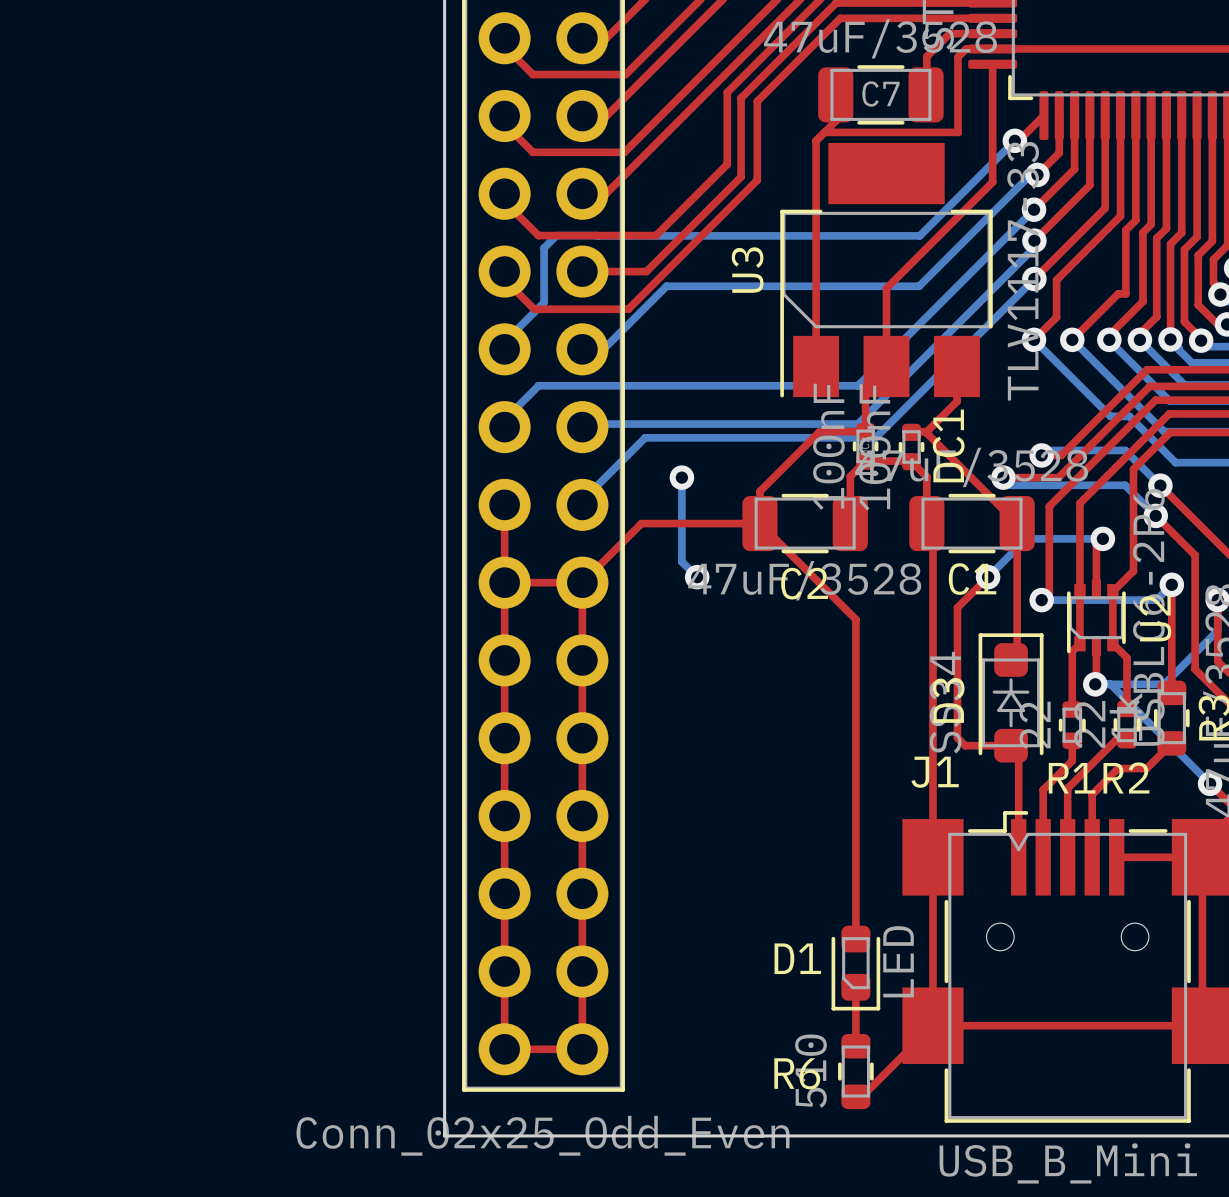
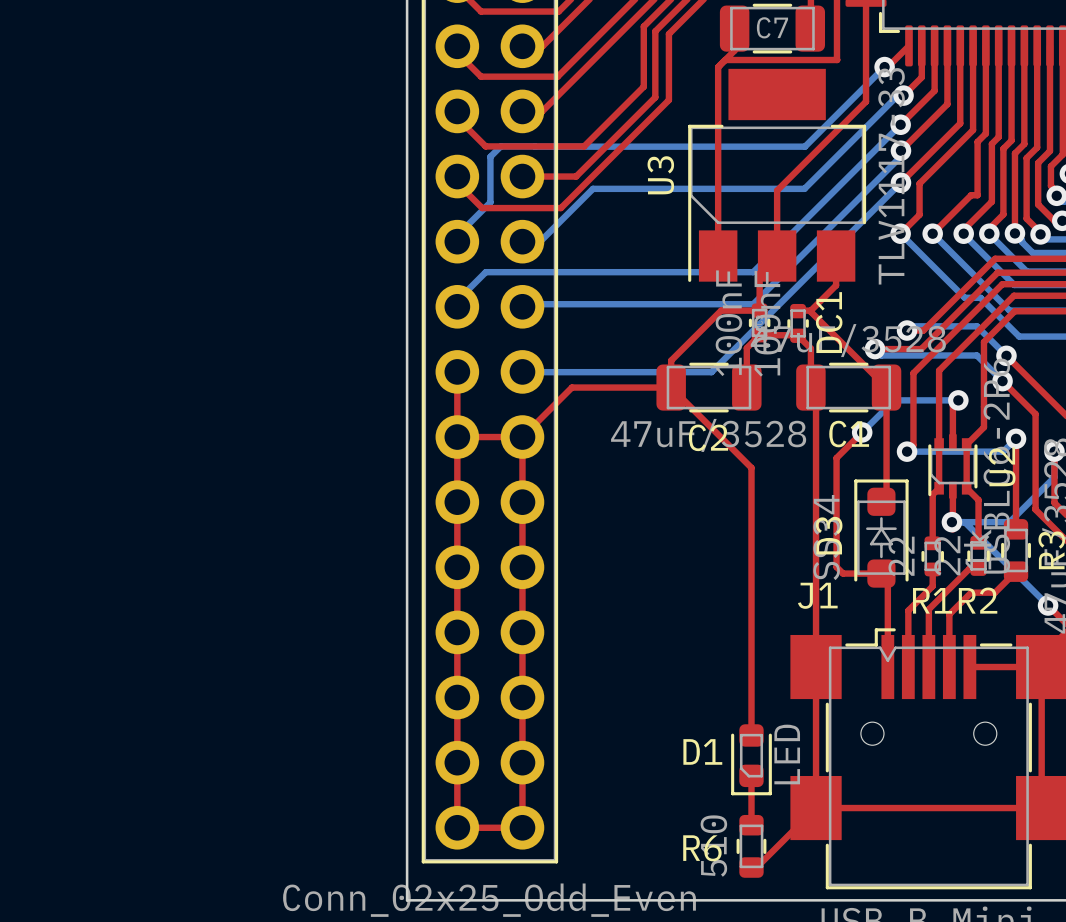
bottom track: (875, 437) (645, 437) (582, 500) (582, 504) -> (767, 315) (711, 372) (516, 372)
bottom track: (681, 477) (681, 561) (697, 577) -> none
via: (681, 477) -> none
via: (697, 577) -> none

